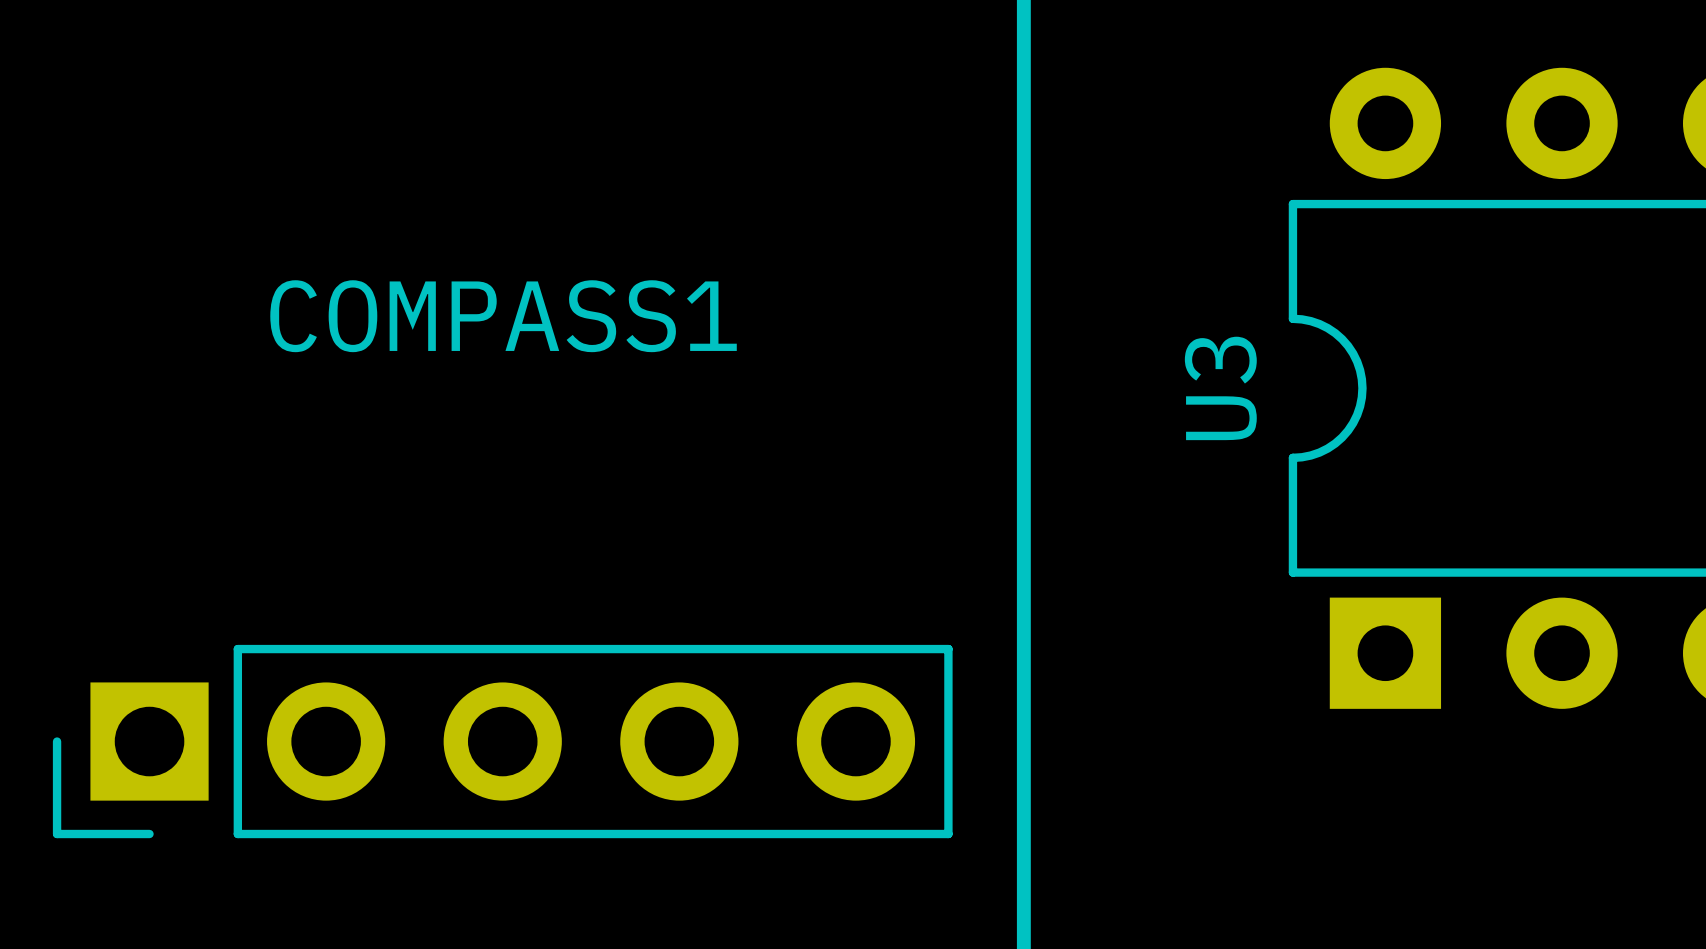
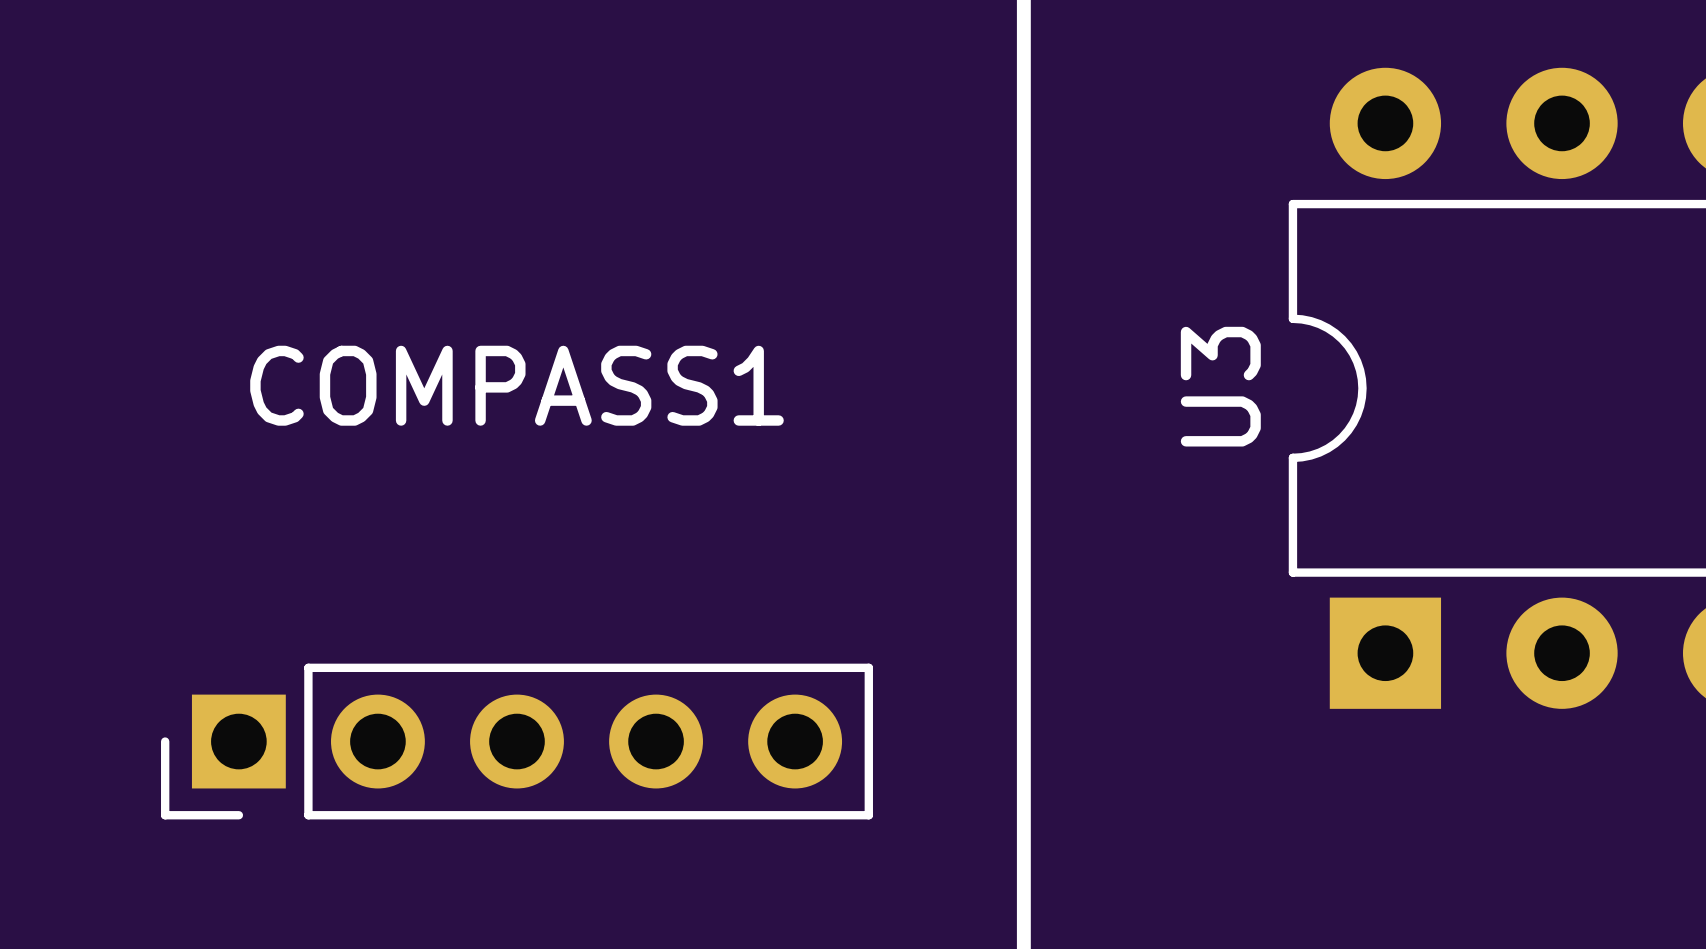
COMPASS1 footprint: [52, 644, 953, 839] -> [161, 663, 873, 820]

